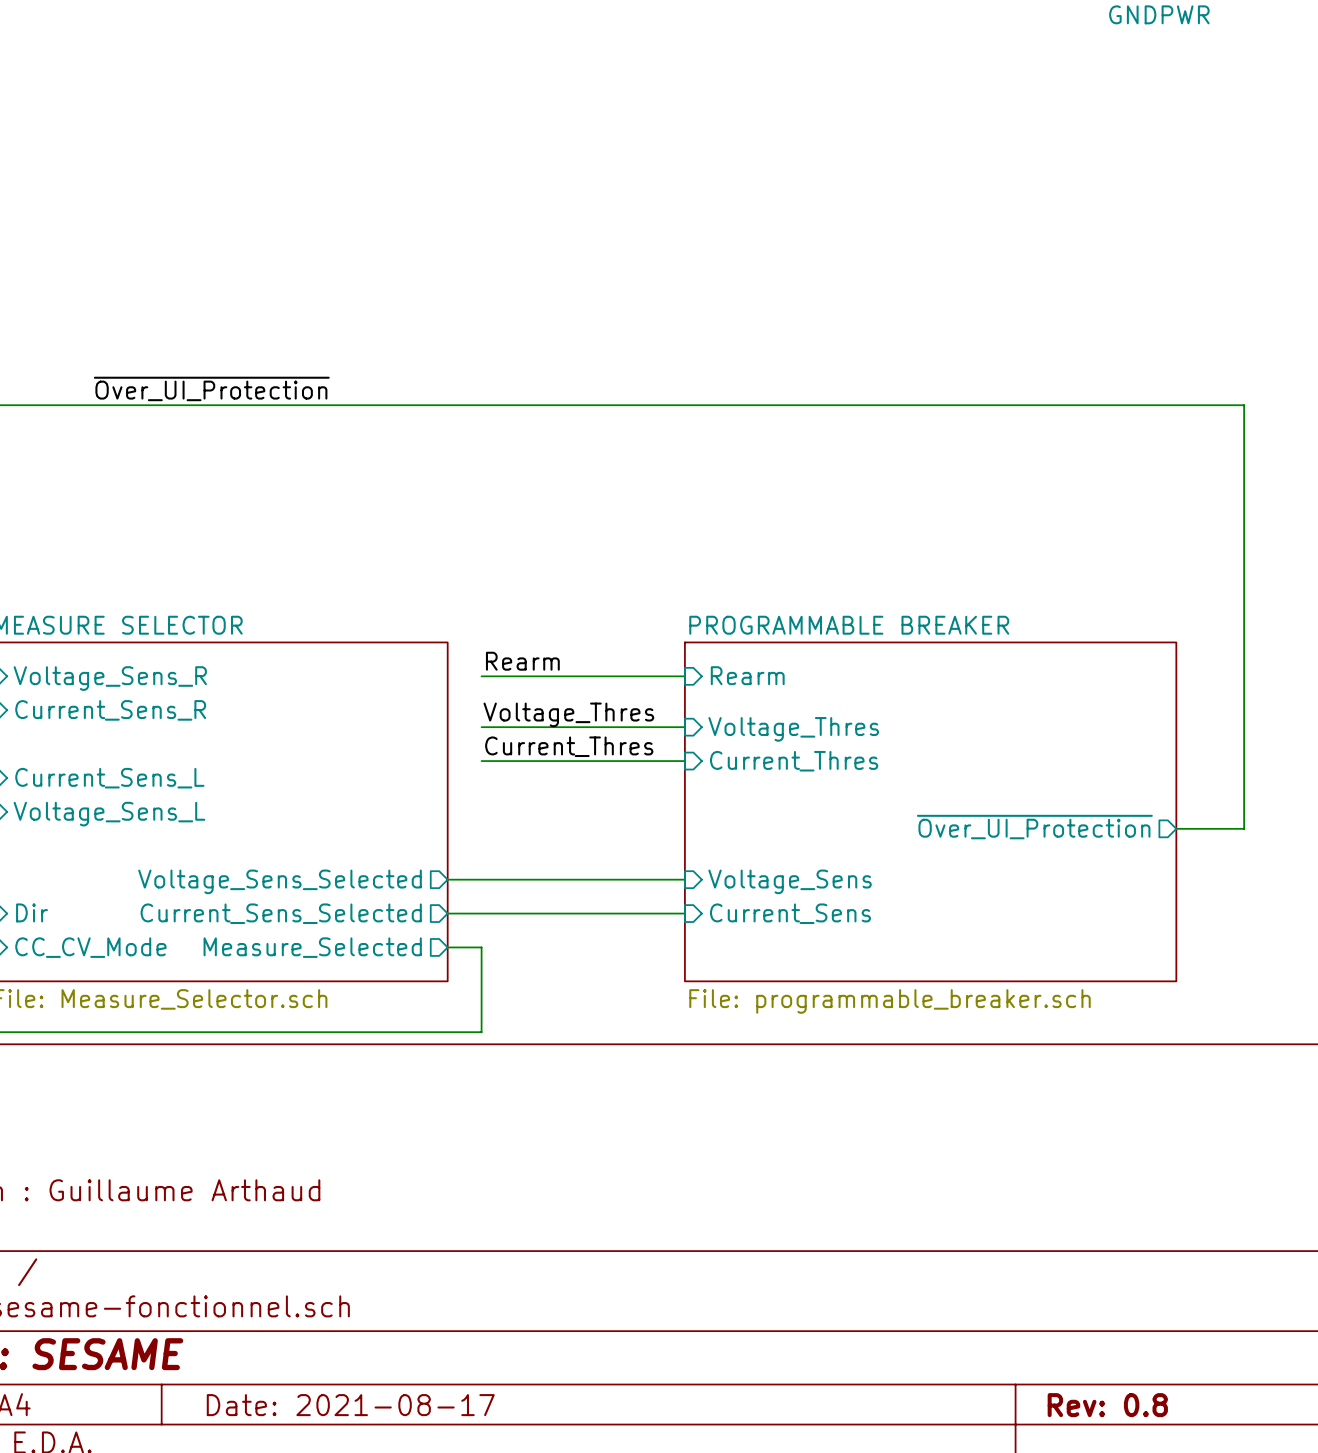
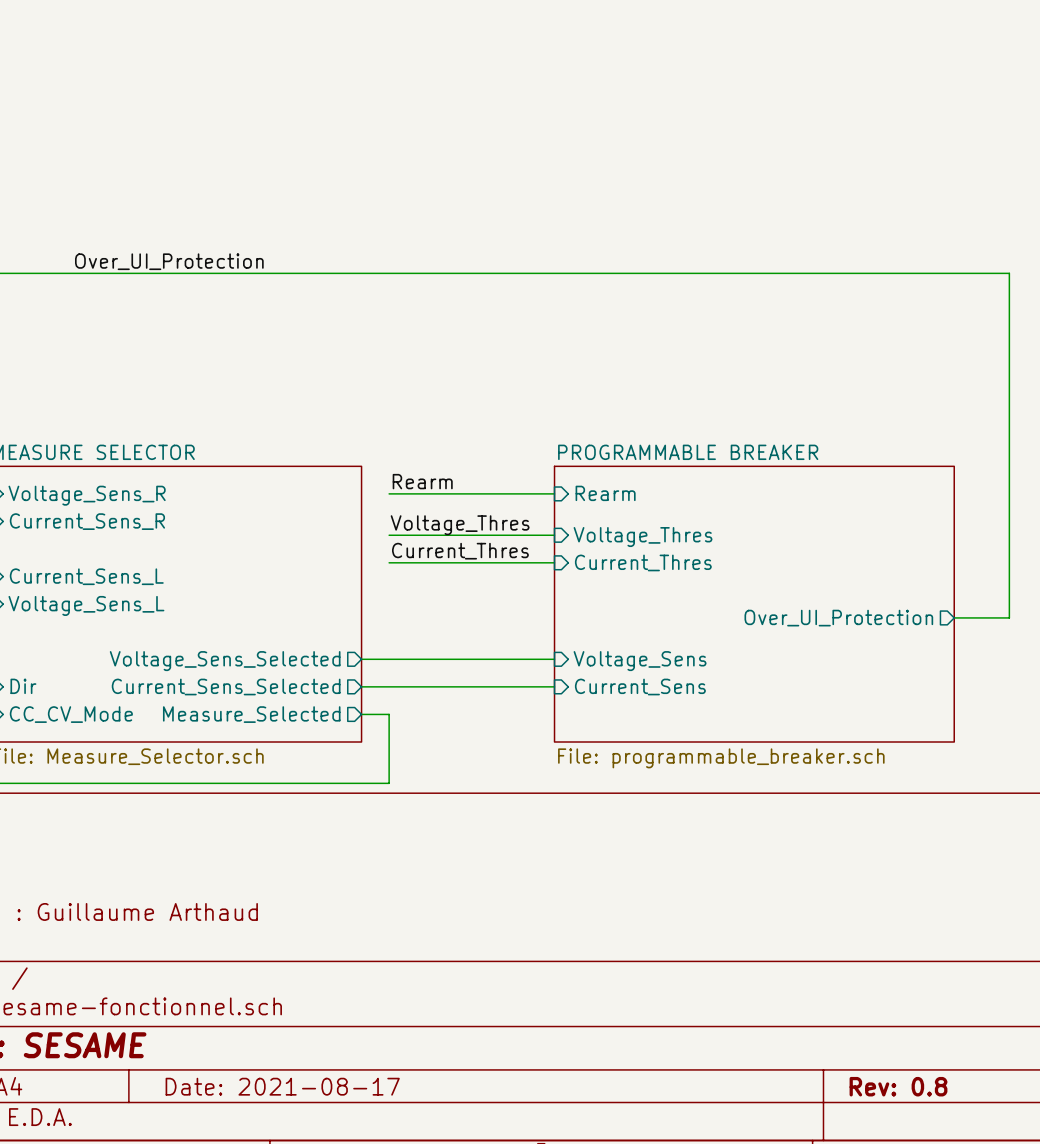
label: ~{Over_UI_Protection} (211, 388) -> Over_UI_Protection (169, 261)
sheet pin: ~{Over_UI_Protection} (1034, 827) -> Over_UI_Protection (838, 618)

